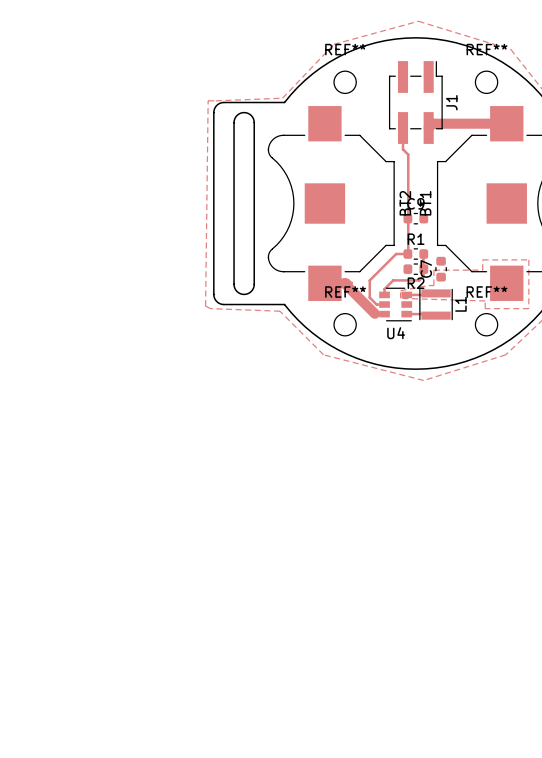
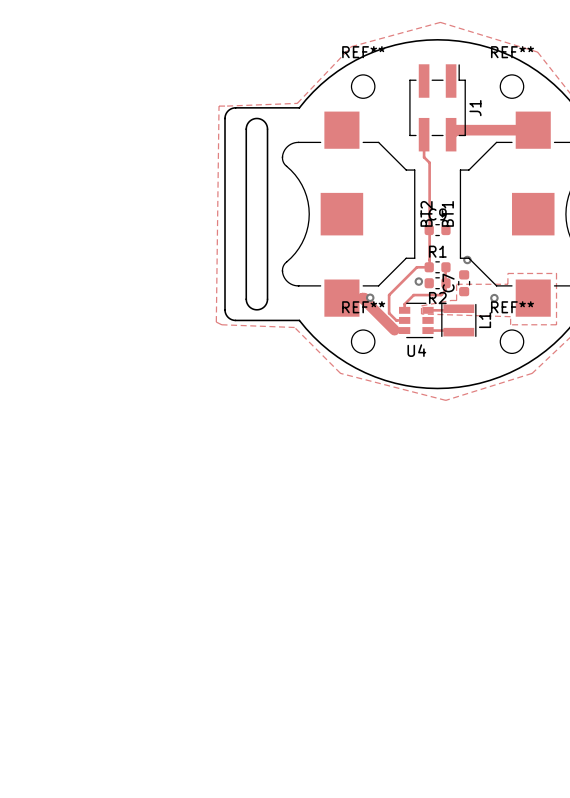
via: none -> (467, 259)
via: none -> (418, 281)
via: none -> (370, 297)
via: none -> (494, 298)

